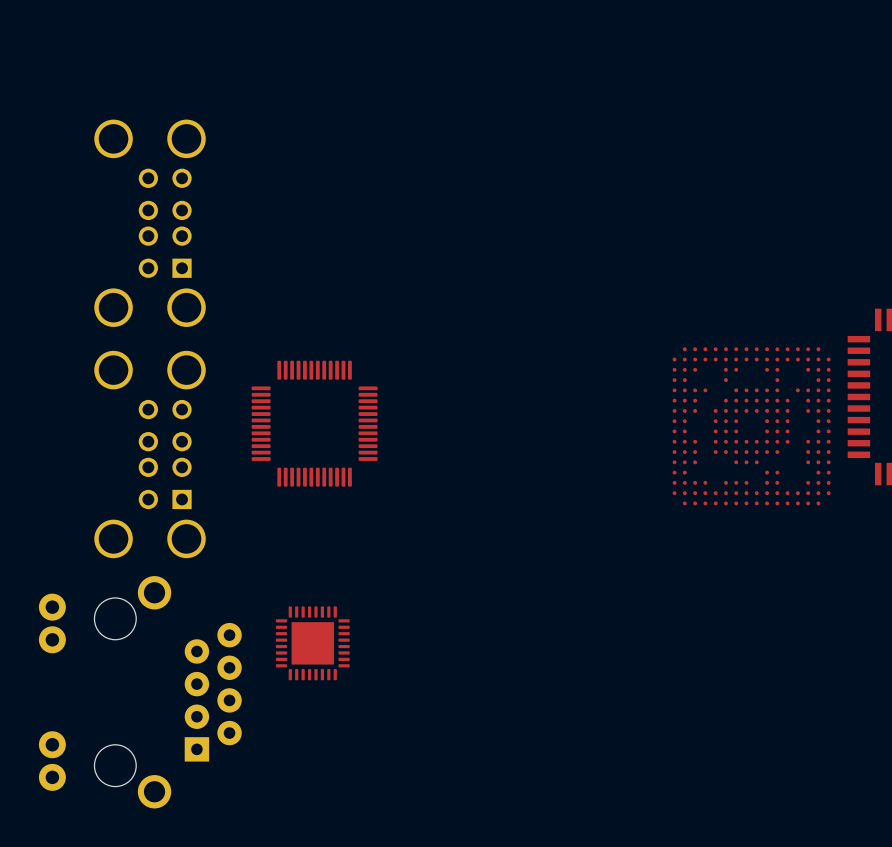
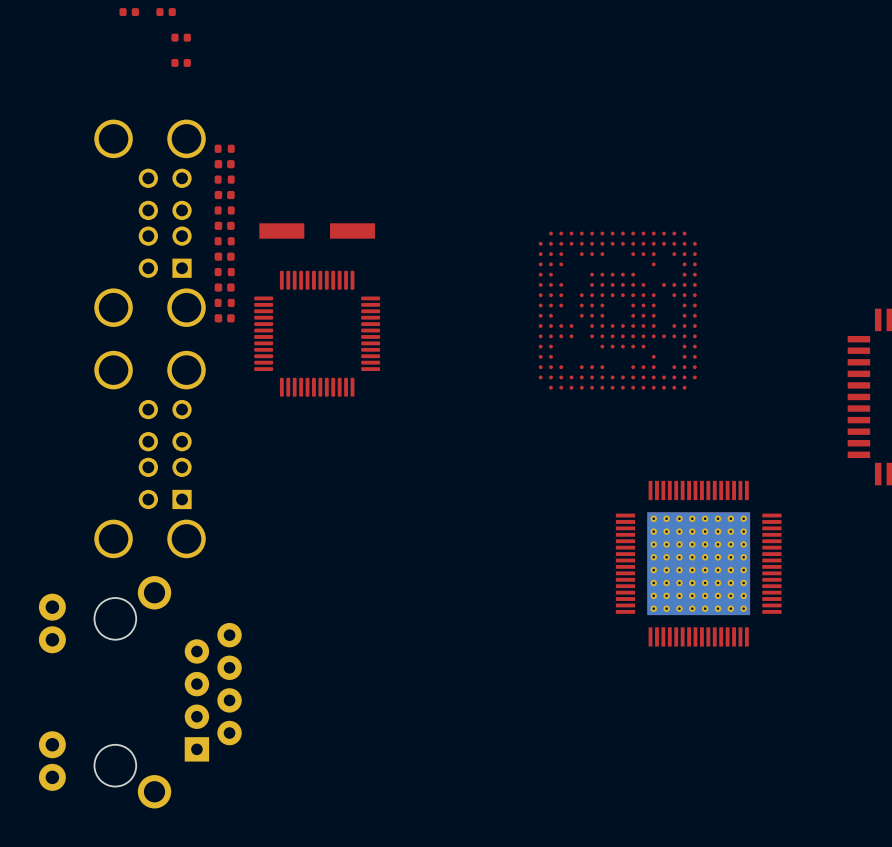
part: none -> (129, 12)
part: none -> (166, 12)
part: none -> (181, 37)
part: none -> (181, 62)
part: none -> (224, 148)
part: none -> (224, 164)
part: none -> (224, 179)
part: none -> (224, 195)
part: none -> (224, 210)
part: none -> (224, 225)
part: none -> (317, 230)
part: none -> (224, 241)
part: none -> (224, 256)
part: none -> (224, 272)
part: none -> (224, 287)
part: none -> (224, 302)
part: none -> (224, 318)
part position: (314, 423) -> (317, 333)
part rotation: 0° (751, 426) -> 90° clockwise (617, 310)
part position: (751, 426) -> (617, 310)
part: none -> (698, 563)
part: (312, 643) -> none

